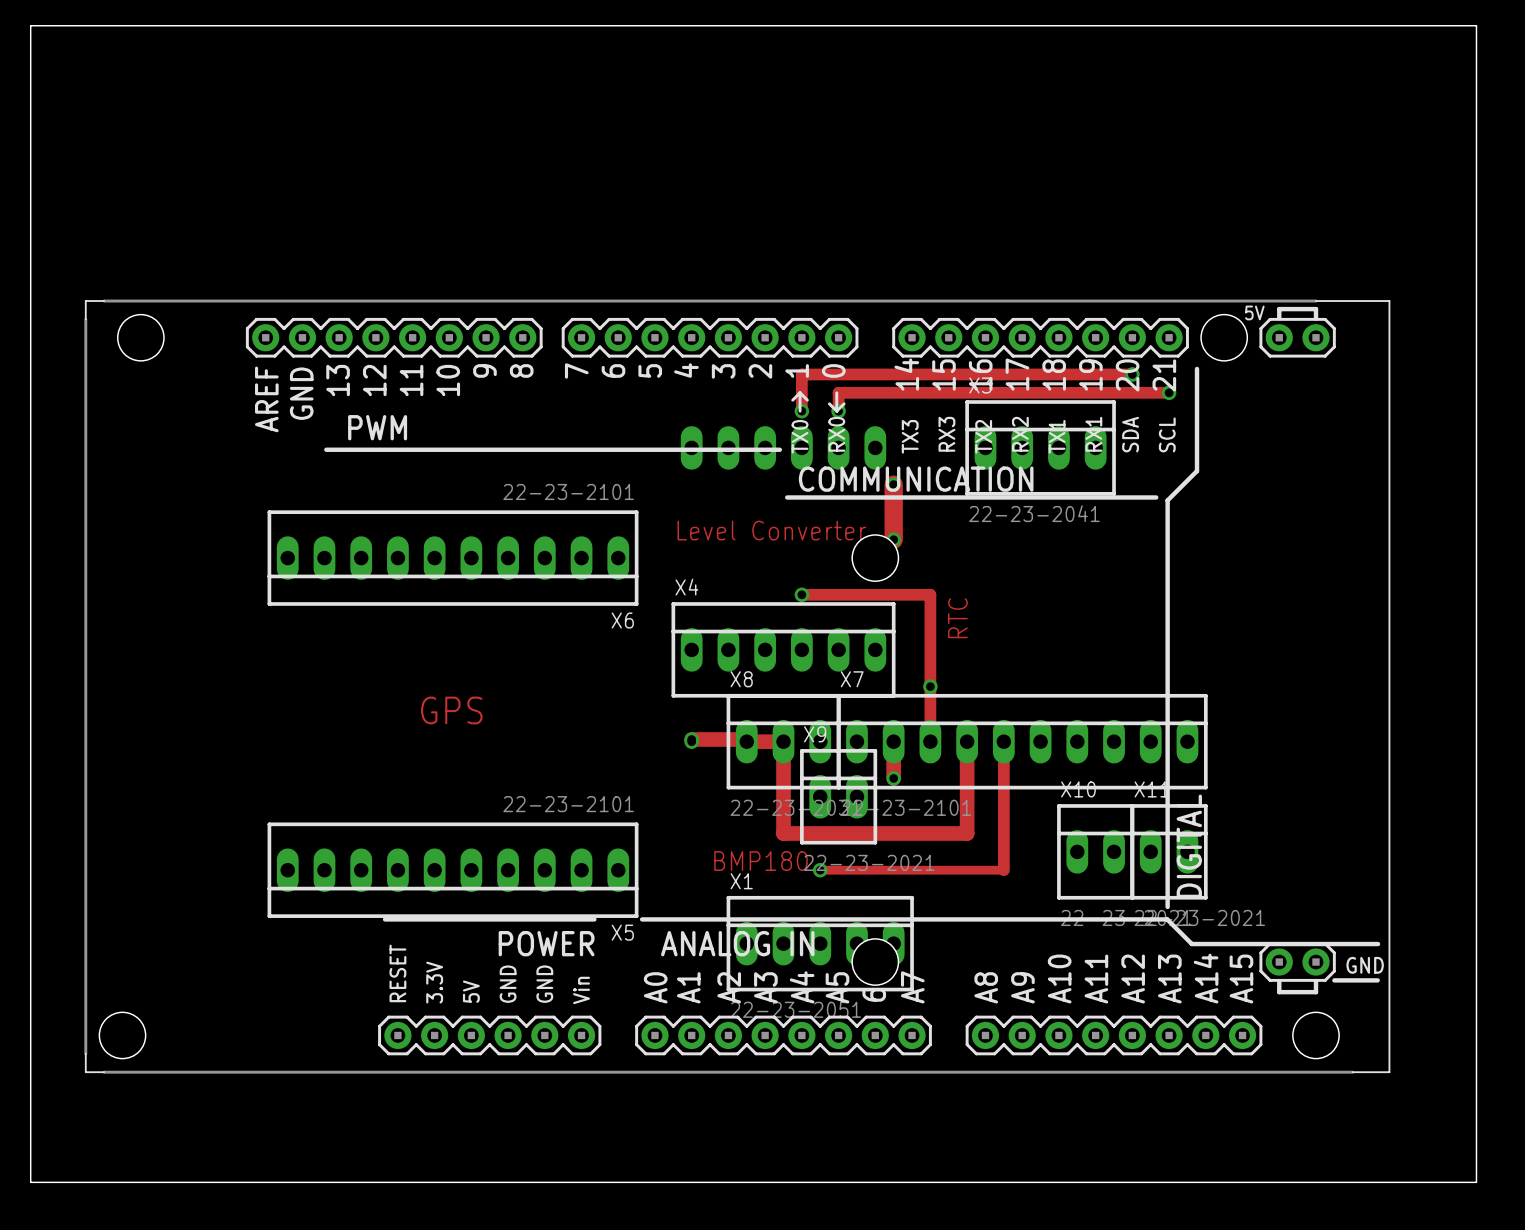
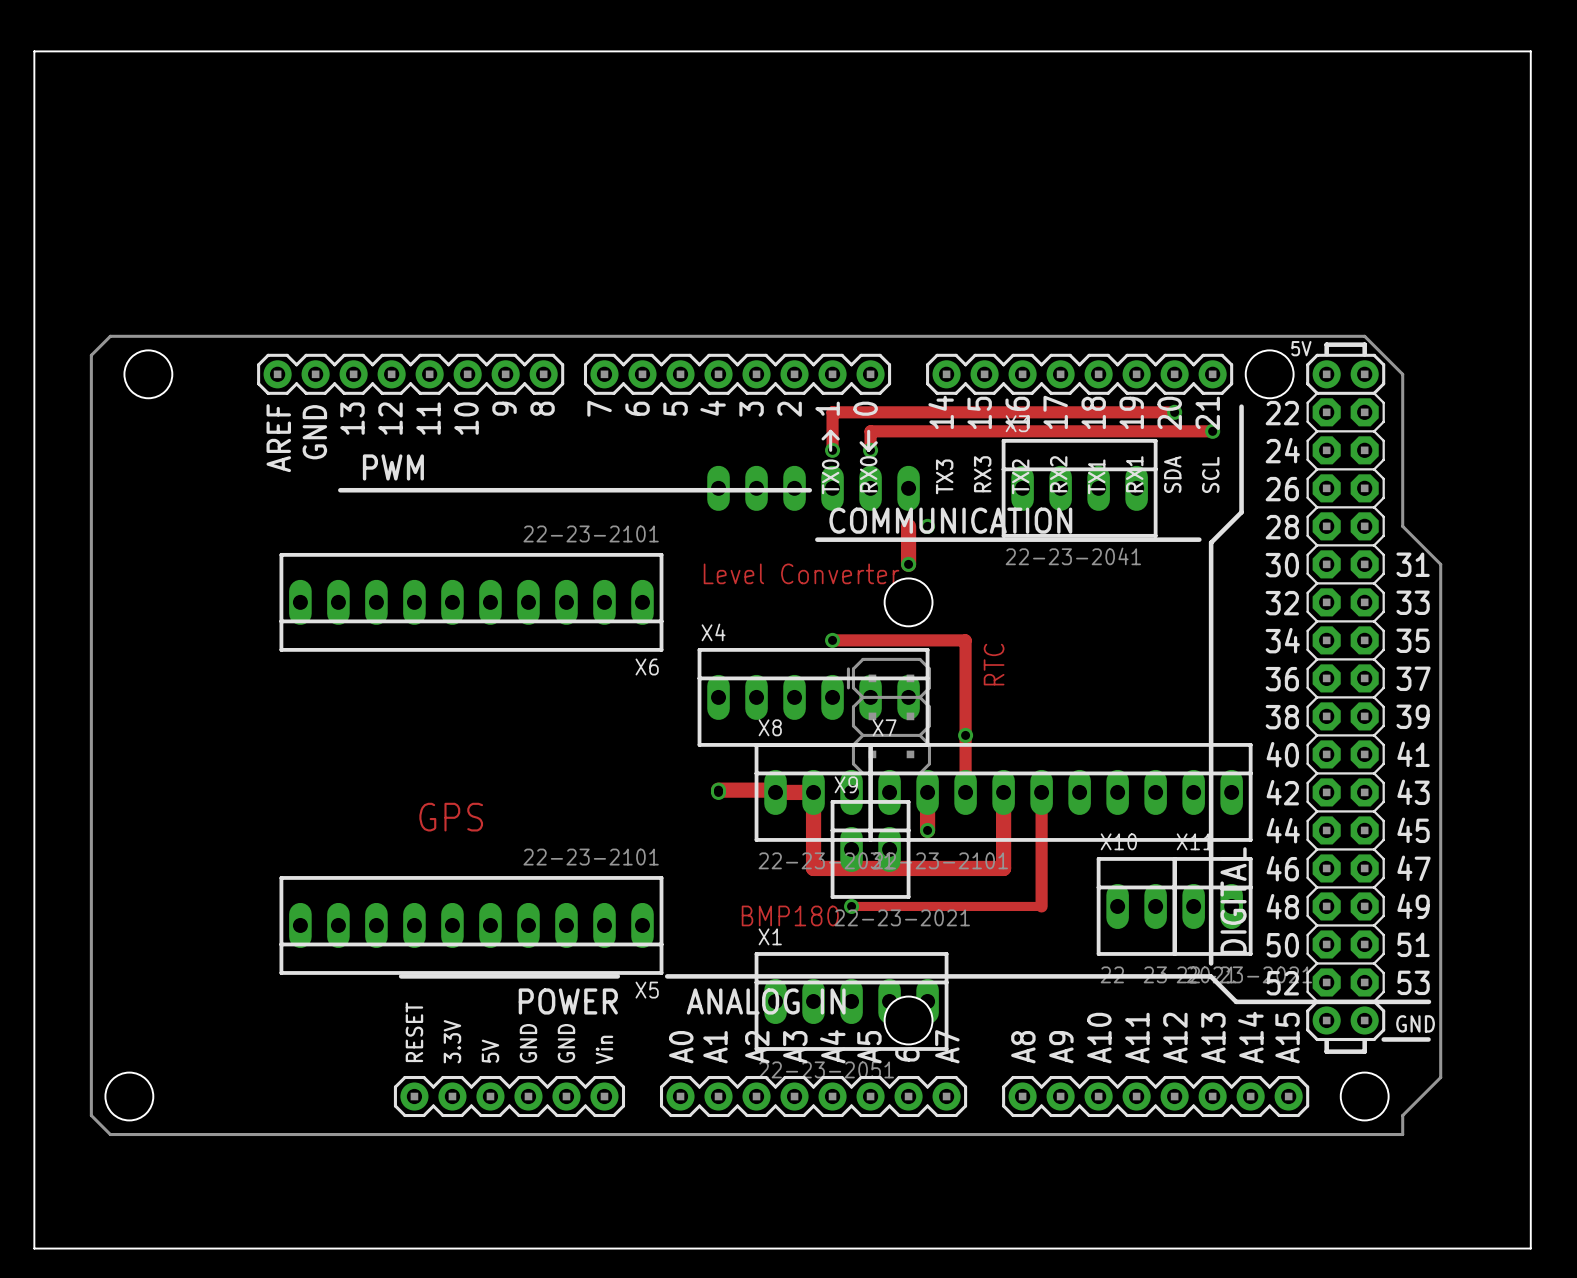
part footprint: [84, 299, 1391, 1074] -> [89, 334, 1443, 1137]
track: none -> (908, 526) (908, 564)
track: (893, 484) (893, 539) -> none
via position: (893, 539) -> (908, 564)
text position: GPS (451, 710) -> GPS (451, 817)
track: (783, 815) (783, 833) (967, 833) (967, 815) -> (813, 868) (1003, 868)
track: (1003, 851) (1003, 870) (820, 870) -> (1041, 906) (851, 906)
via position: (820, 870) -> (851, 906)

